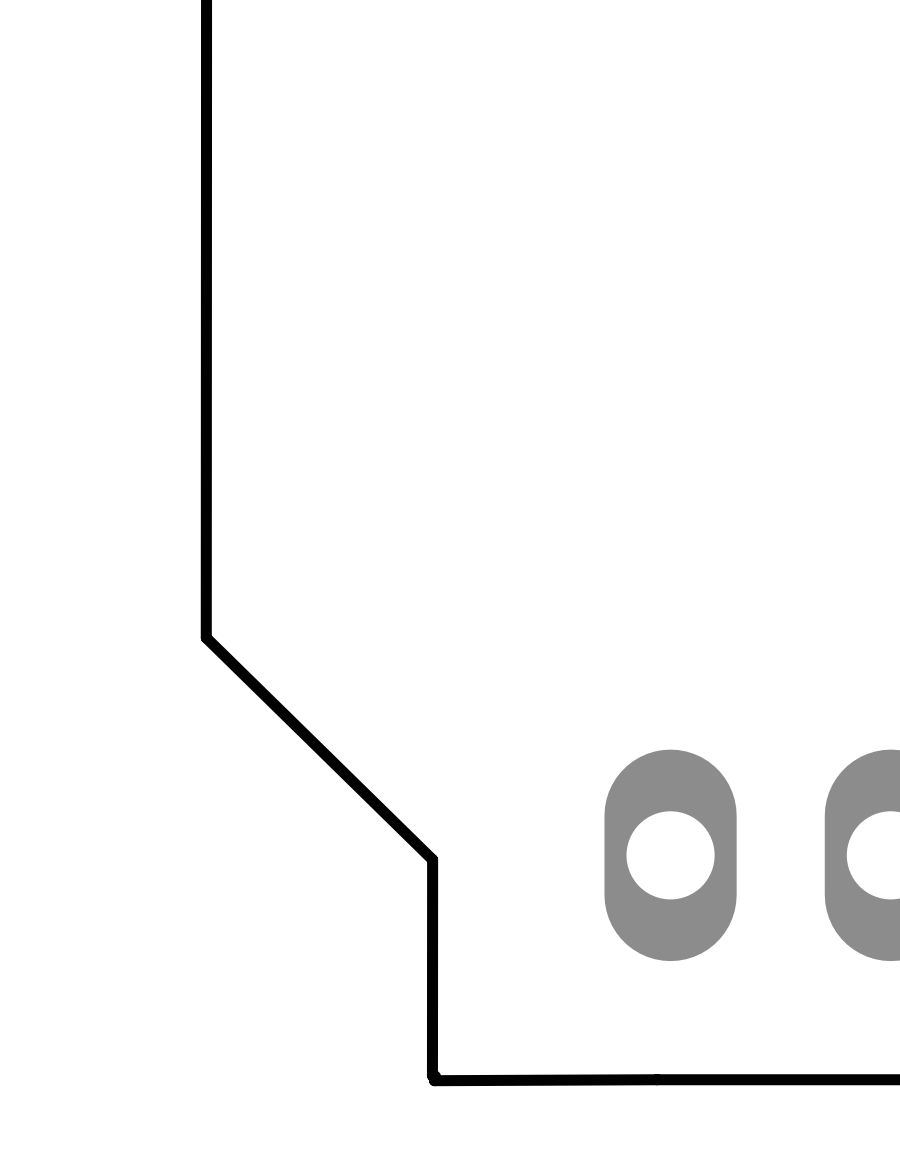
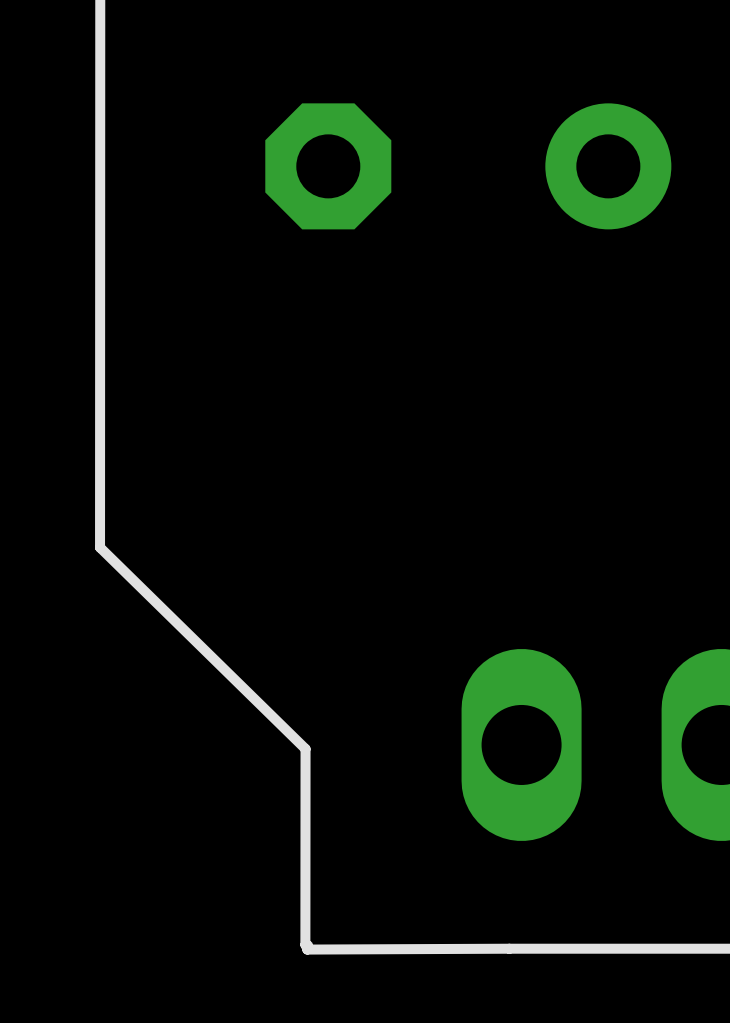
part: none -> (468, 166)

